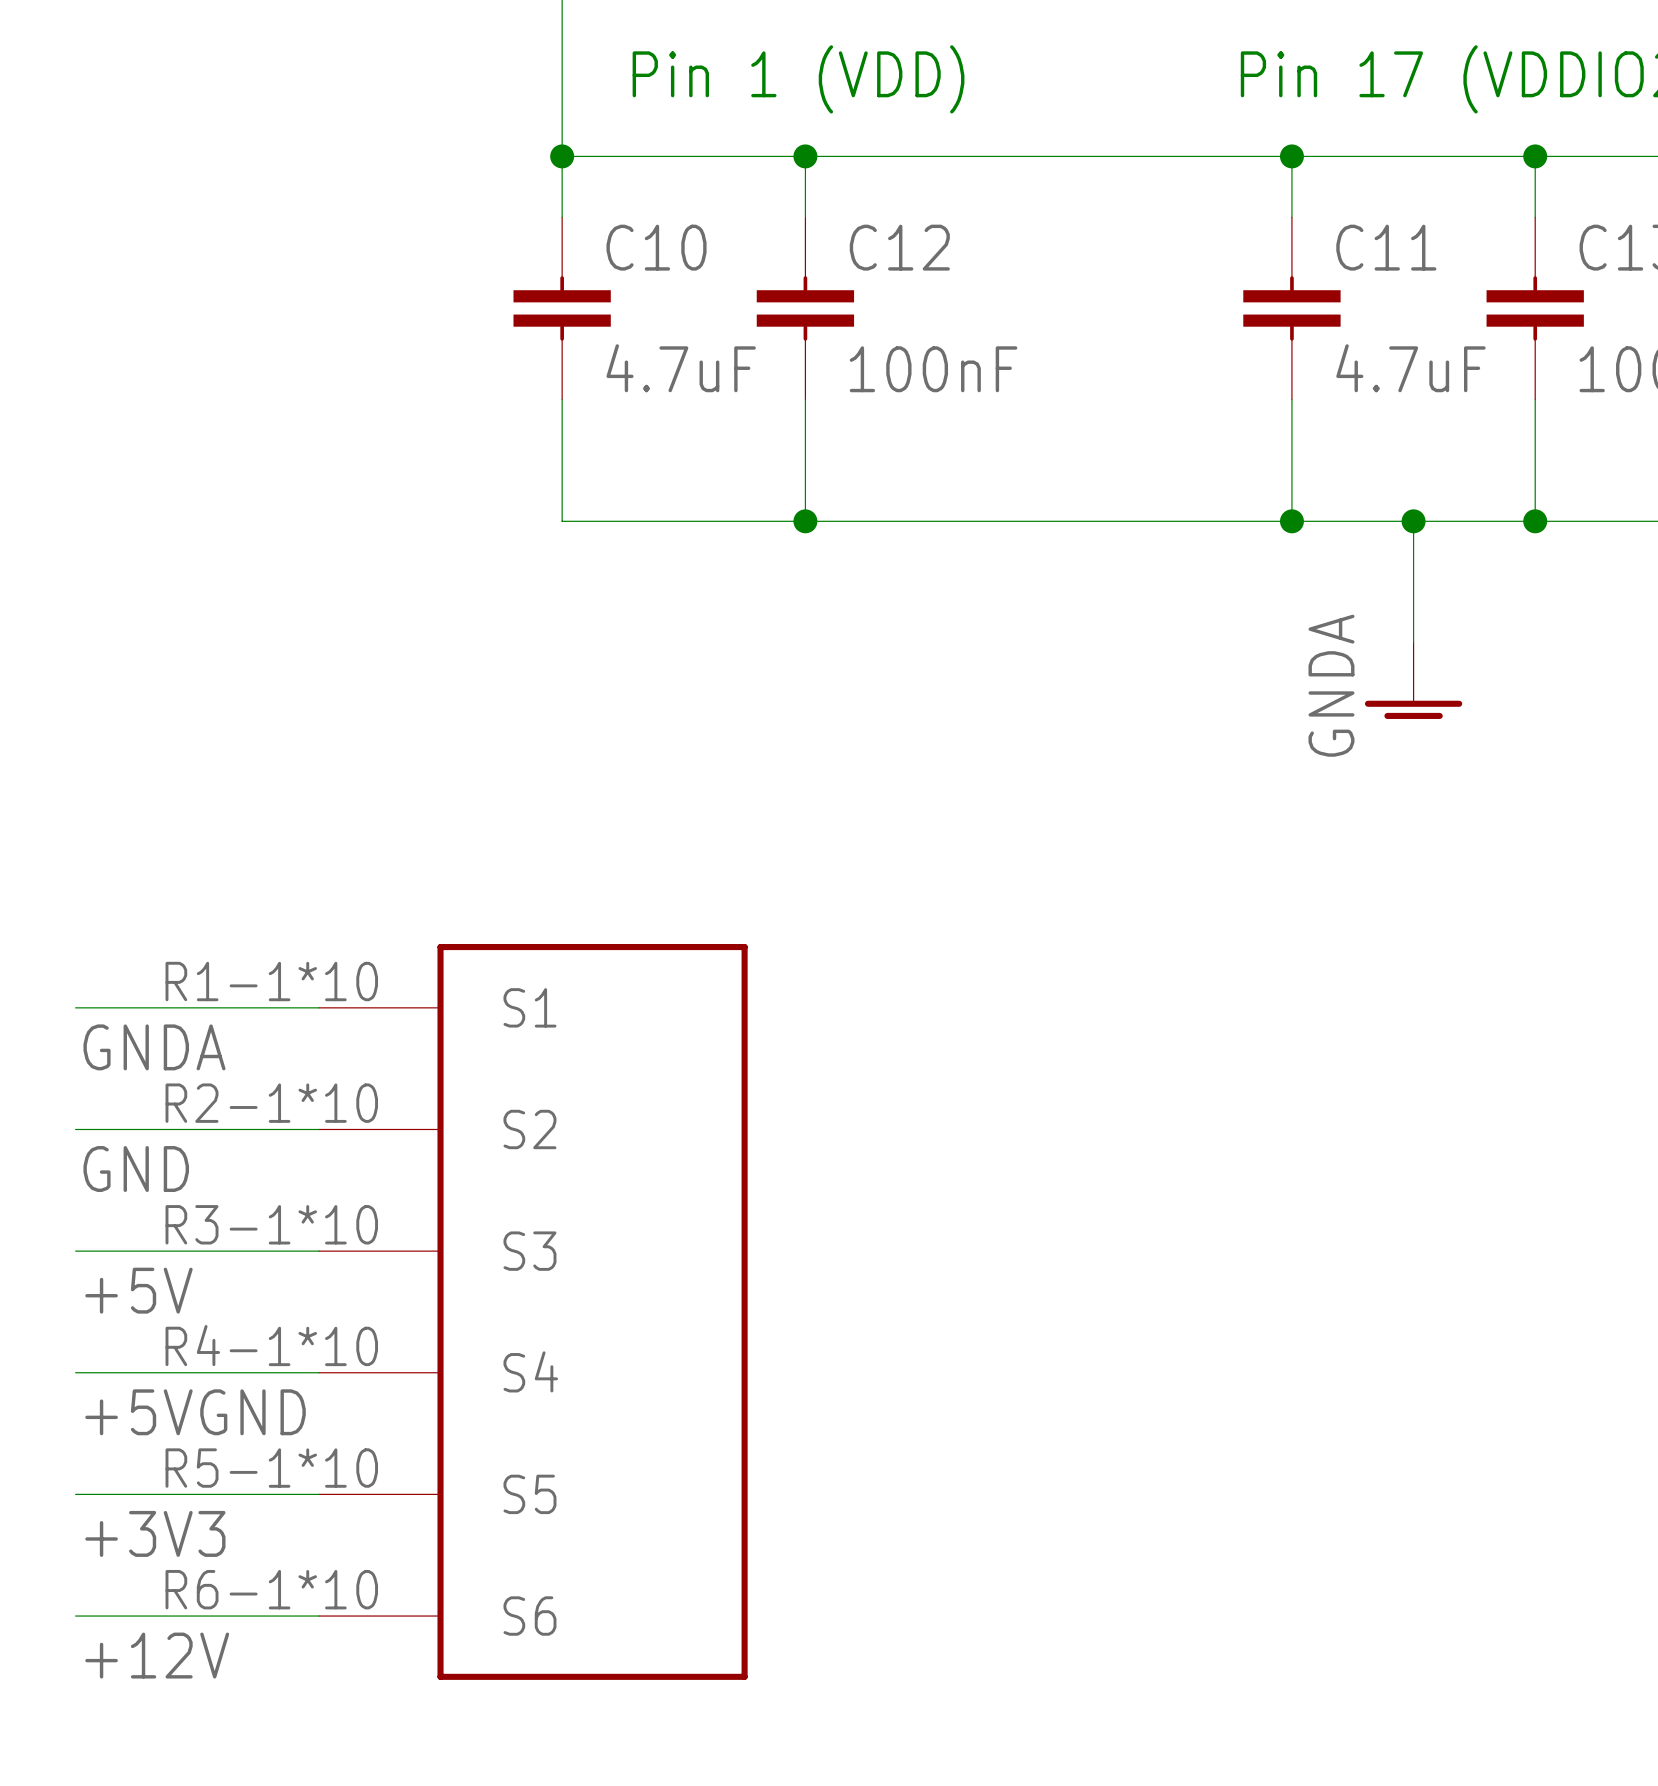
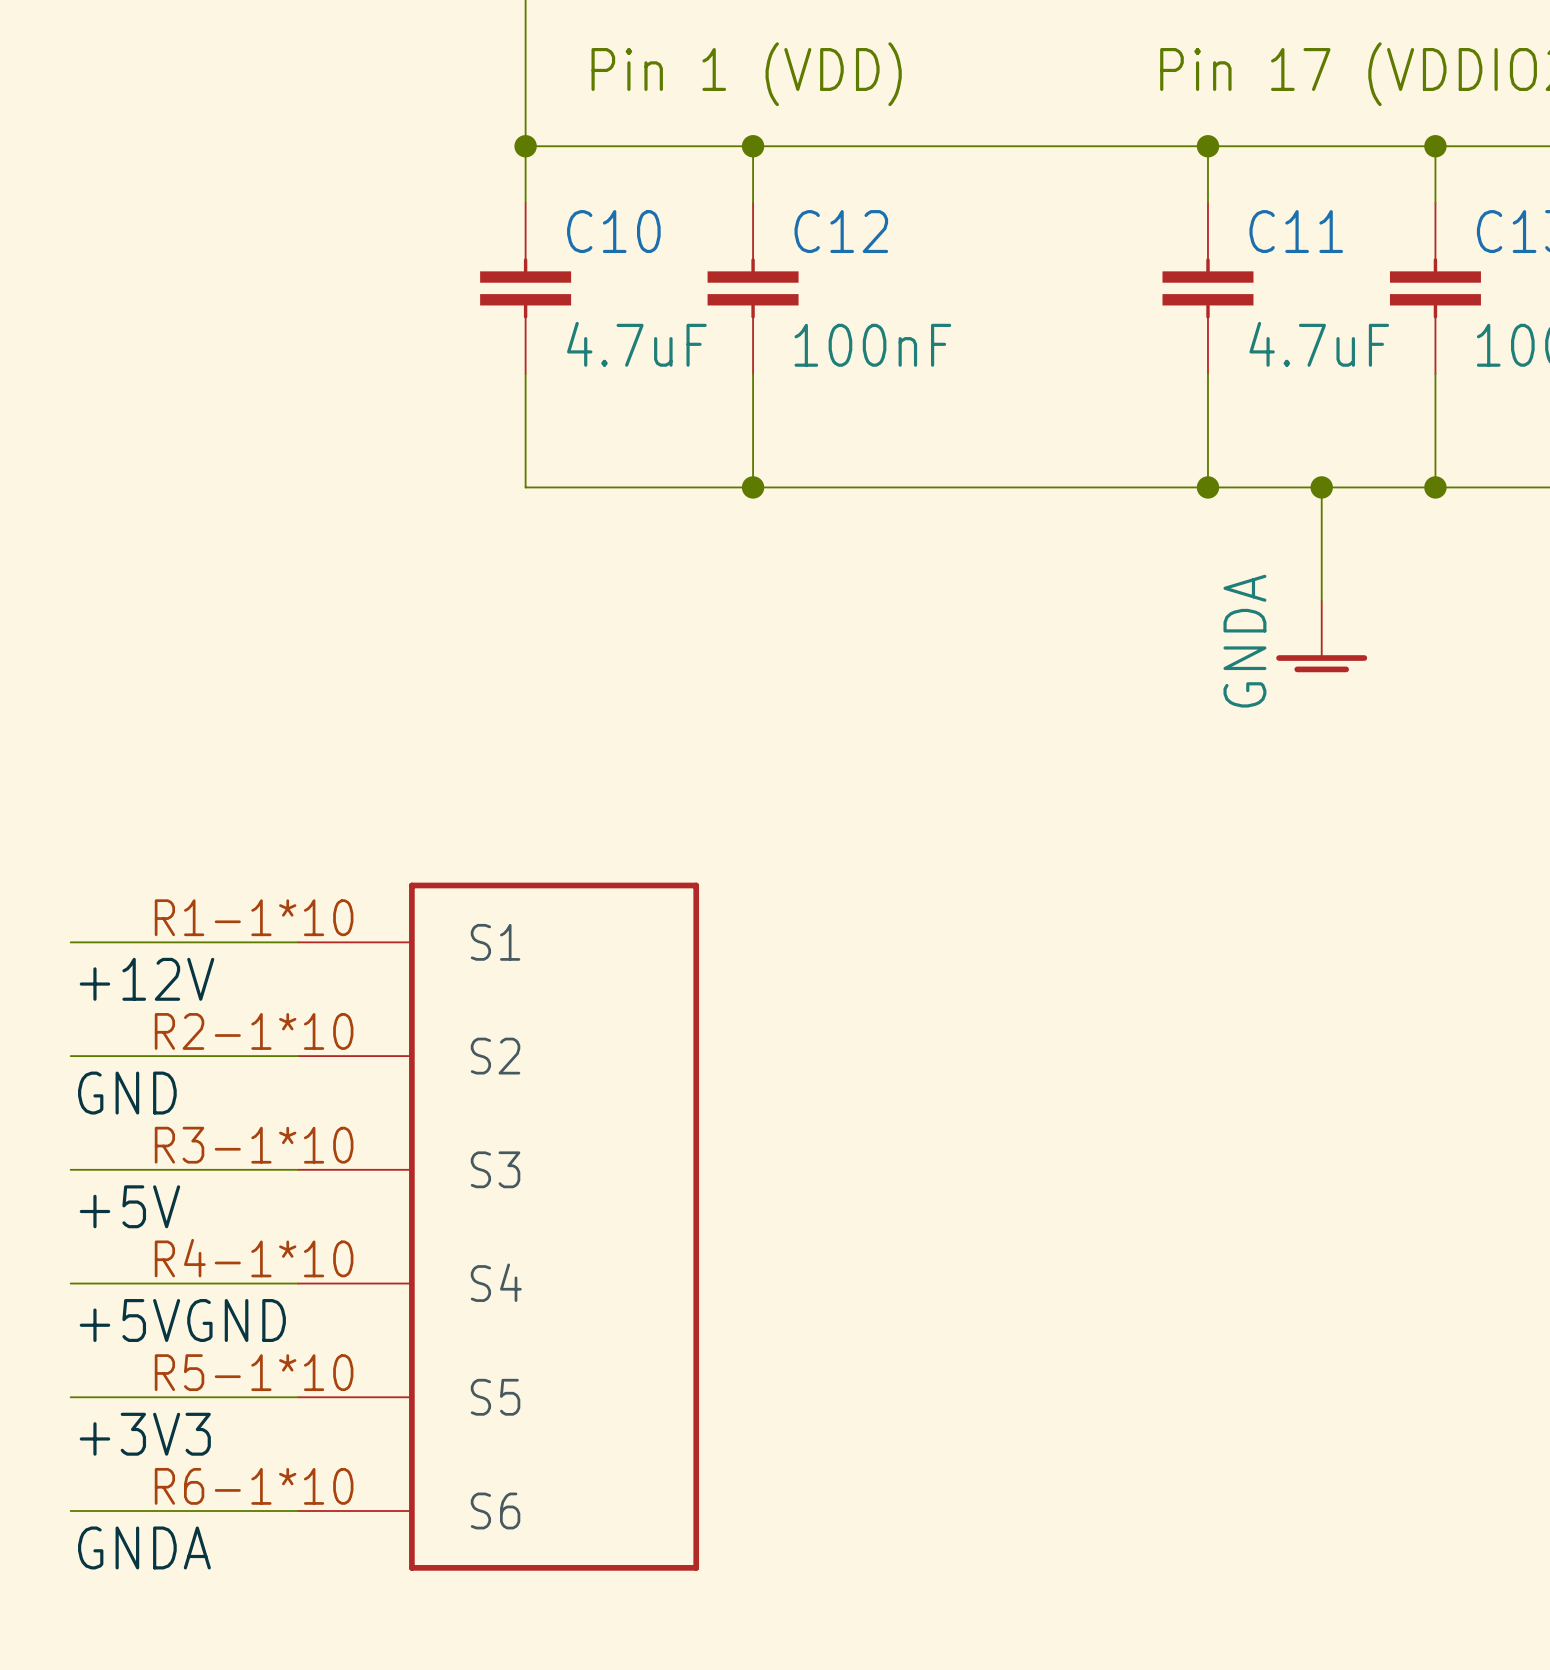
label: GNDA (154, 1047) -> +12V (147, 979)
label: +12V (157, 1655) -> GNDA (144, 1547)

